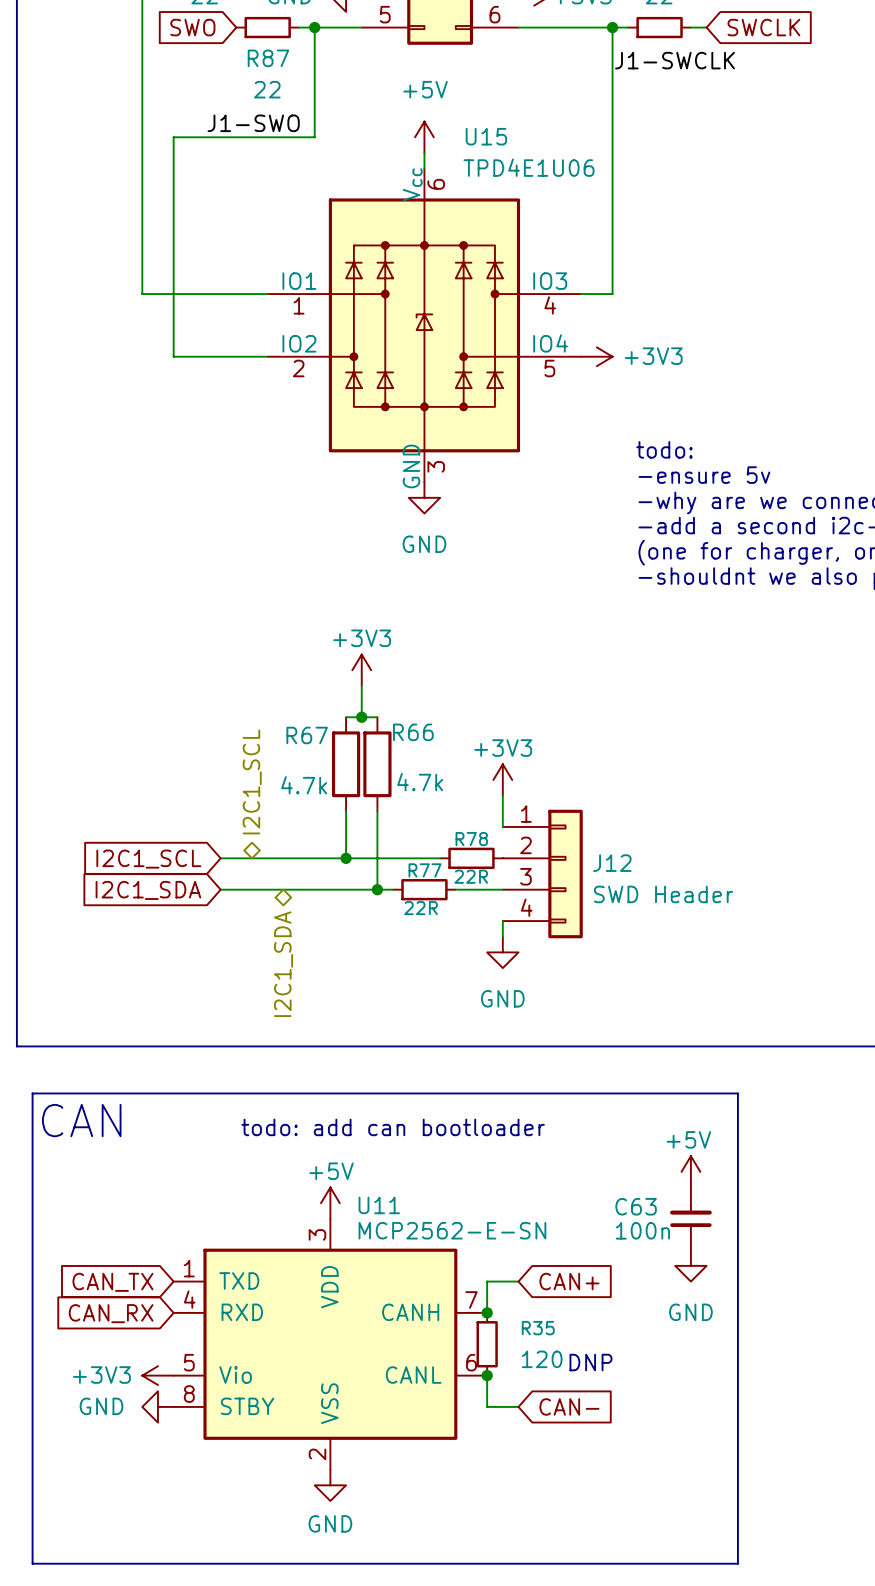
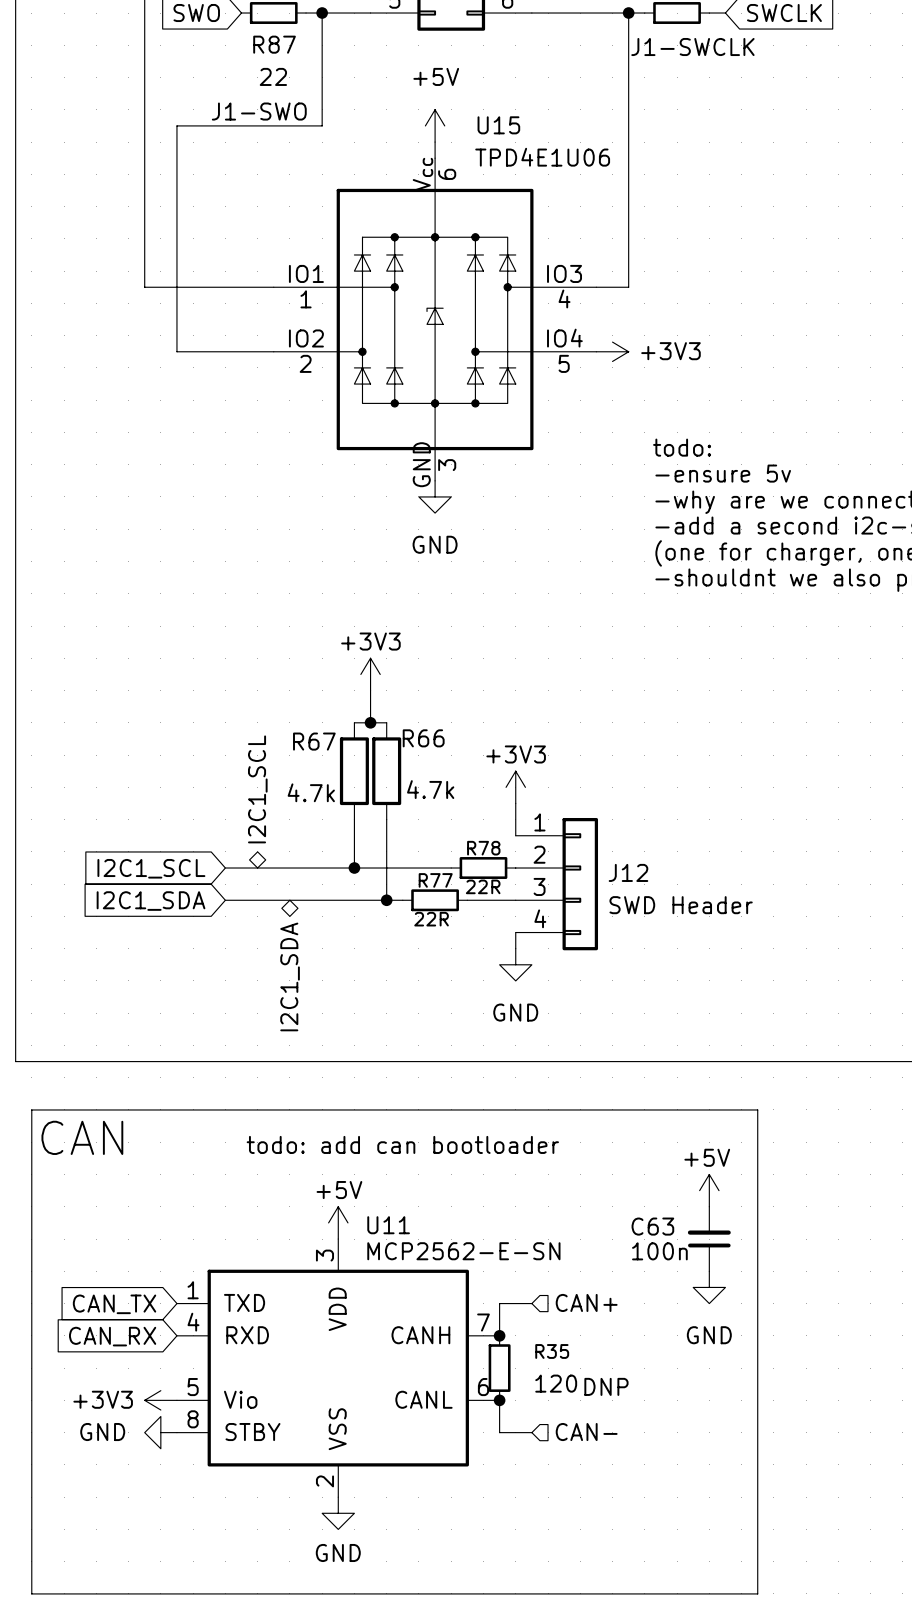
hierarchical label: none -> CAN+ (586, 1302)
global label: CAN+ (569, 1281) -> none
global label: CAN- (569, 1406) -> none
hierarchical label: none -> CAN- (586, 1432)

